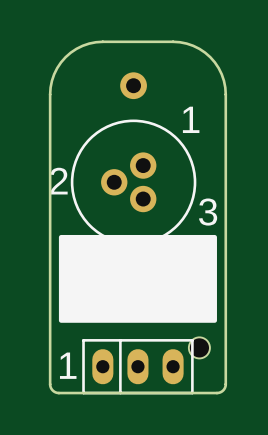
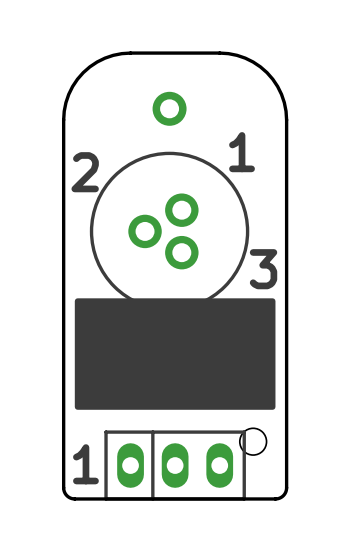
text position: 2 (58, 181) -> 2 (85, 172)

